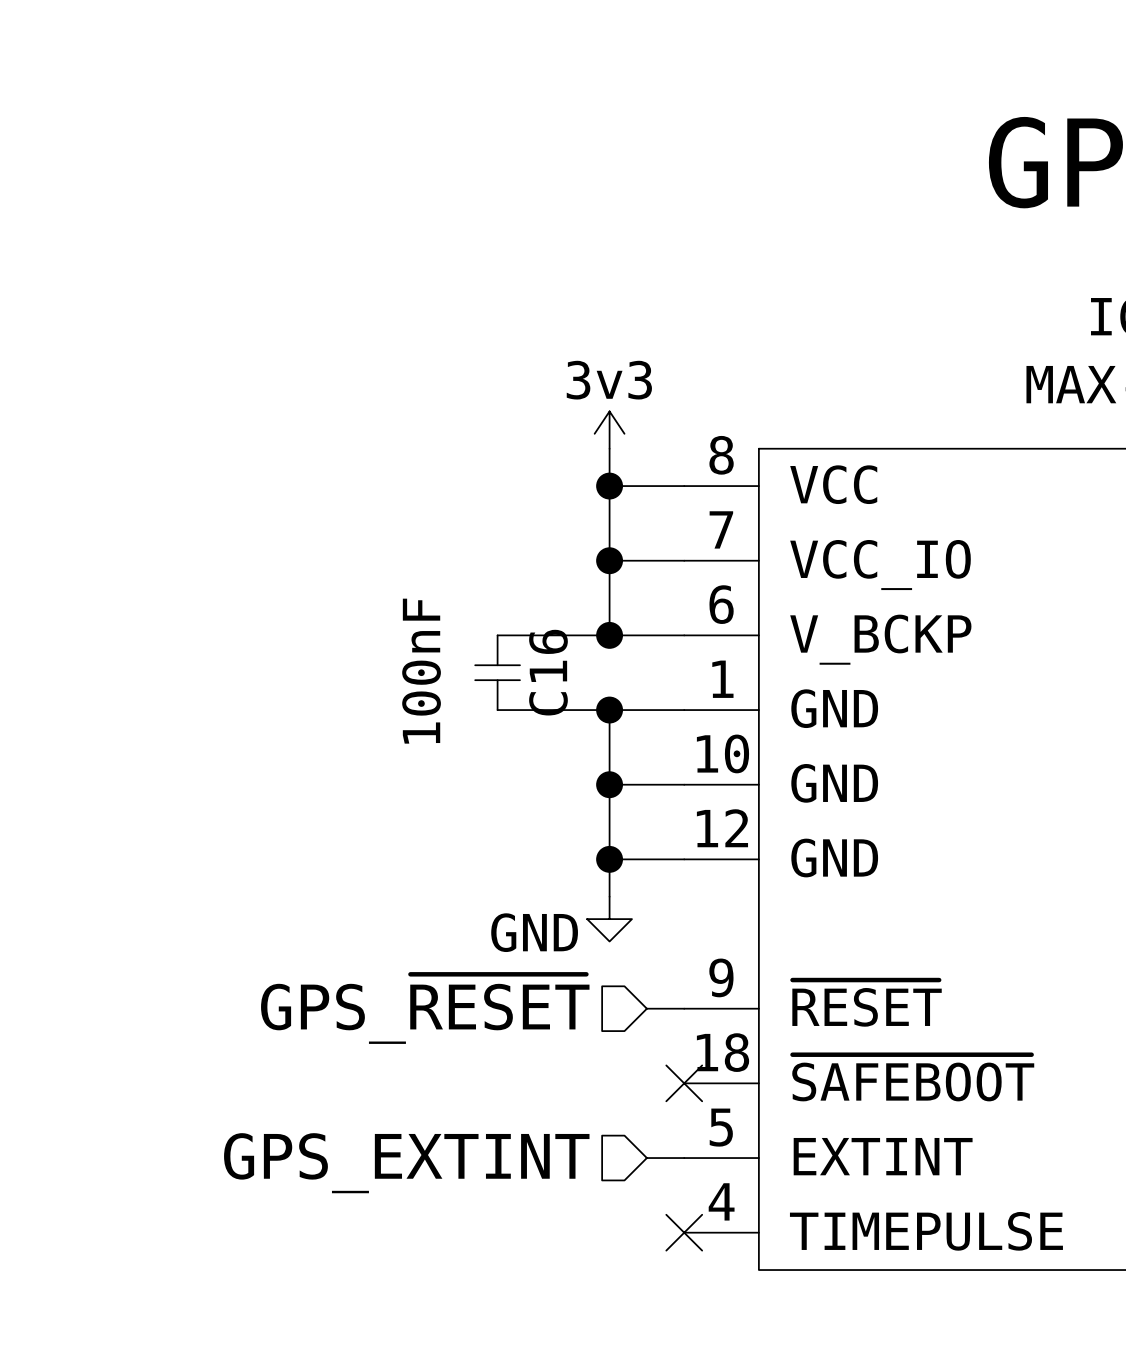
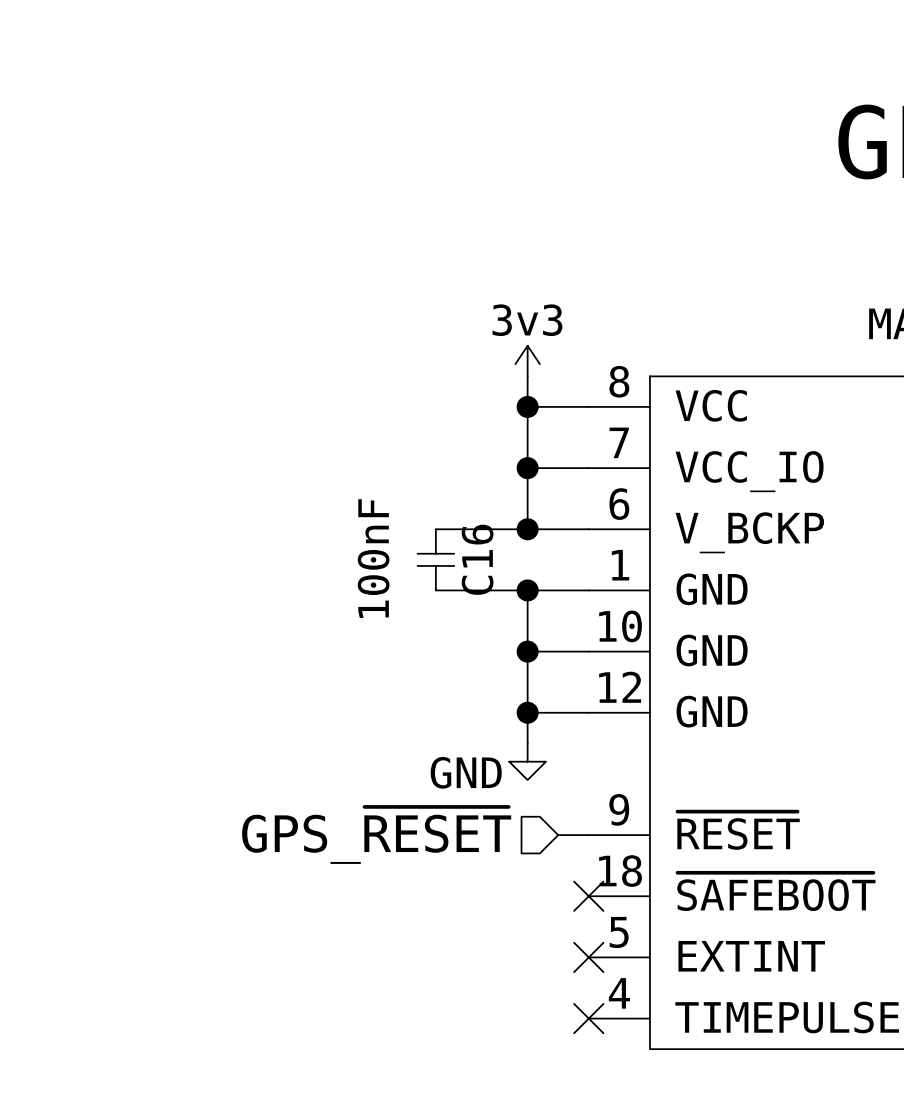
wire: (646, 1158) (684, 1158) -> none
no-connect mark: none -> (588, 957)
hierarchical label: GPS_EXTINT (406, 1163) -> none

